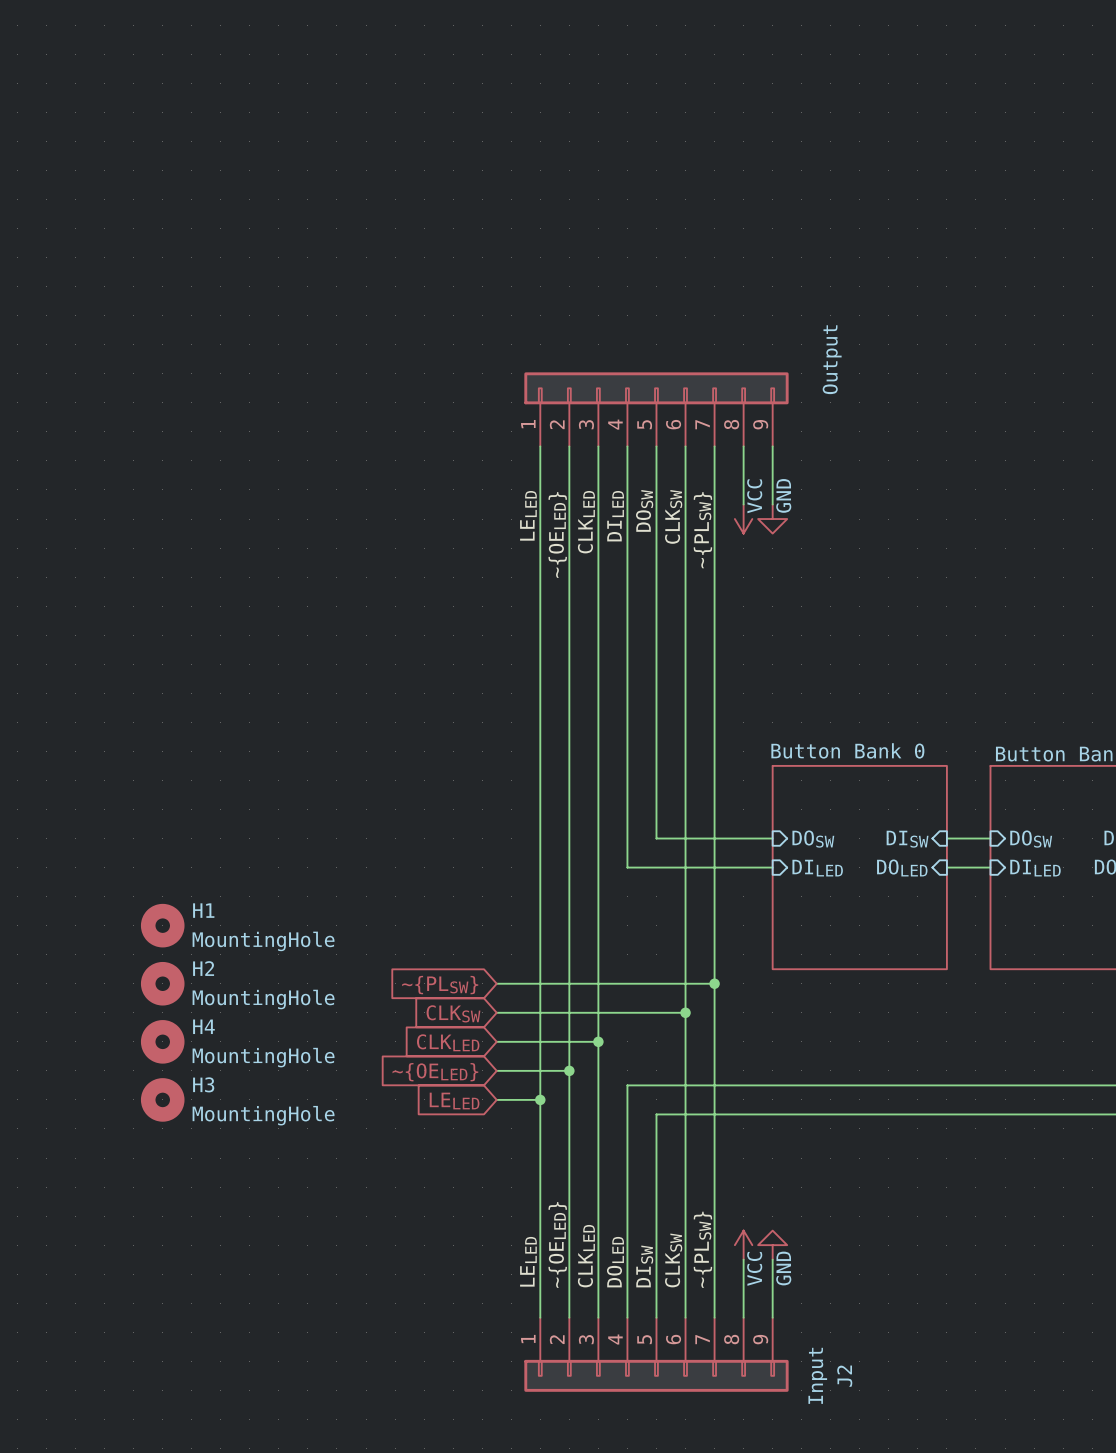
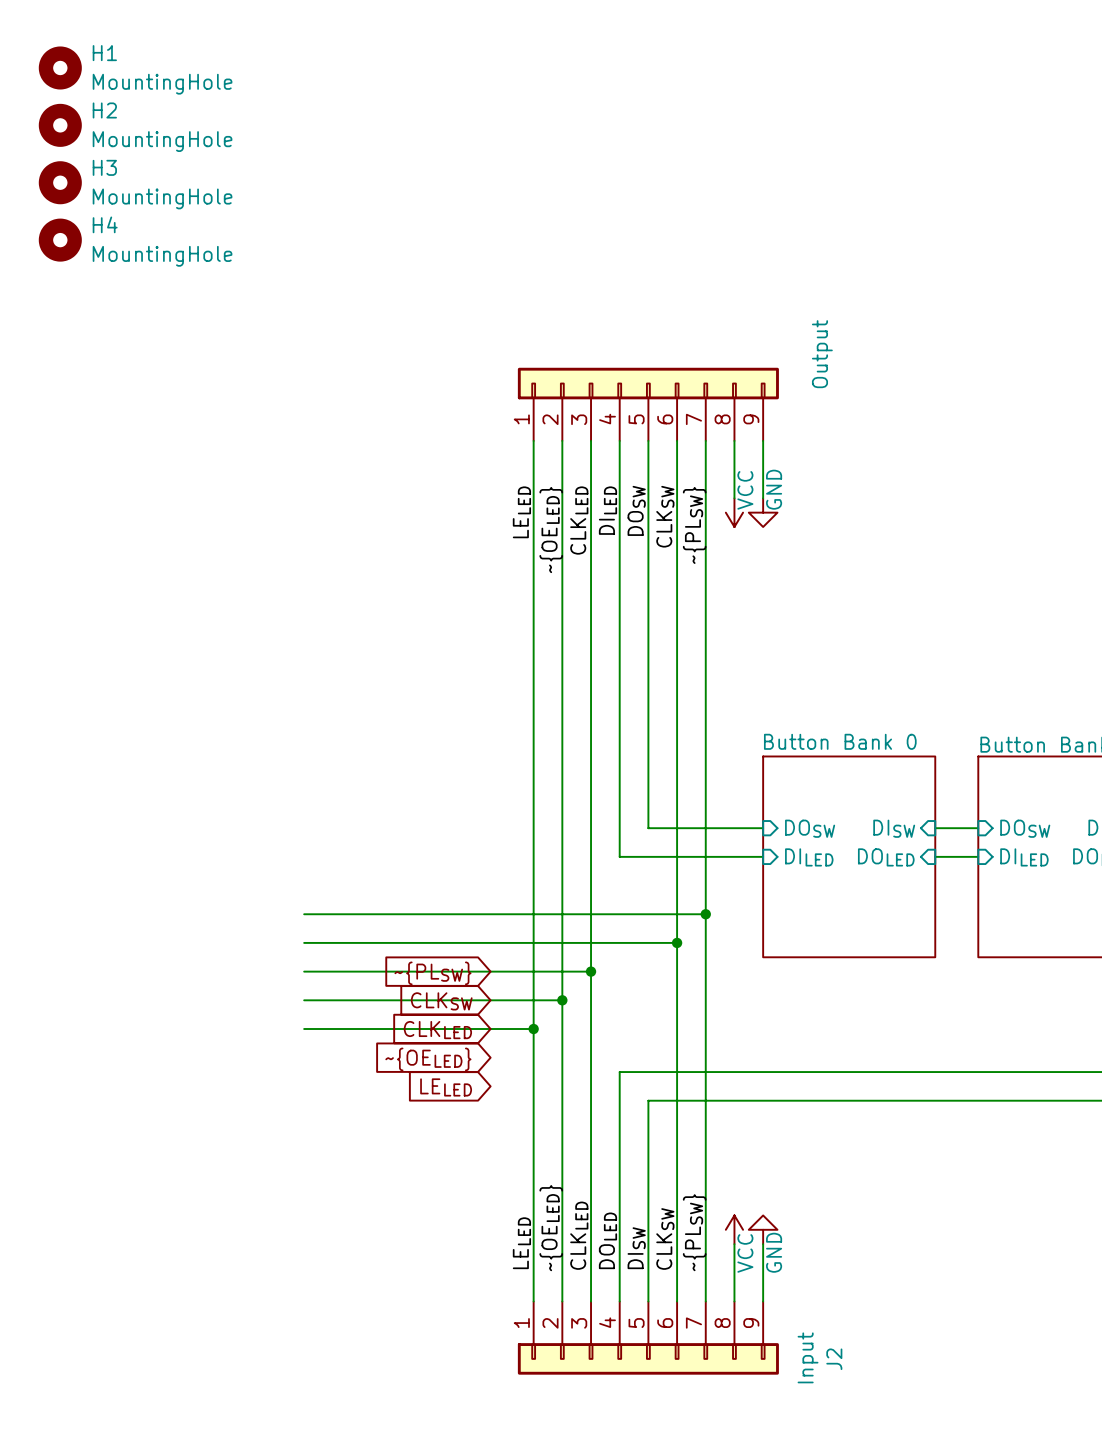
H1 position: (162, 925) -> (60, 67)
wire: none -> (304, 914) (705, 914)
junction: none -> (705, 914)
wire: none -> (304, 942) (677, 942)
junction: none -> (677, 942)
H2 position: (162, 983) -> (60, 125)
wire: none -> (304, 971) (490, 971)
wire: (598, 983) (714, 983) -> none
junction: none -> (591, 971)
junction: (714, 983) -> none
wire: none -> (304, 1000) (490, 1000)
wire: (569, 1012) (685, 1012) -> none
junction: none -> (562, 1000)
junction: (685, 1012) -> none
H4 position: (162, 1041) -> (60, 240)
wire: none -> (304, 1029) (490, 1029)
wire: (540, 1041) (598, 1041) -> none
junction: none -> (533, 1029)
junction: (598, 1041) -> none
wire: (496, 1070) (569, 1070) -> none
junction: (569, 1070) -> none
H3 position: (162, 1099) -> (60, 182)
wire: (496, 1099) (540, 1099) -> none
junction: (540, 1099) -> none

